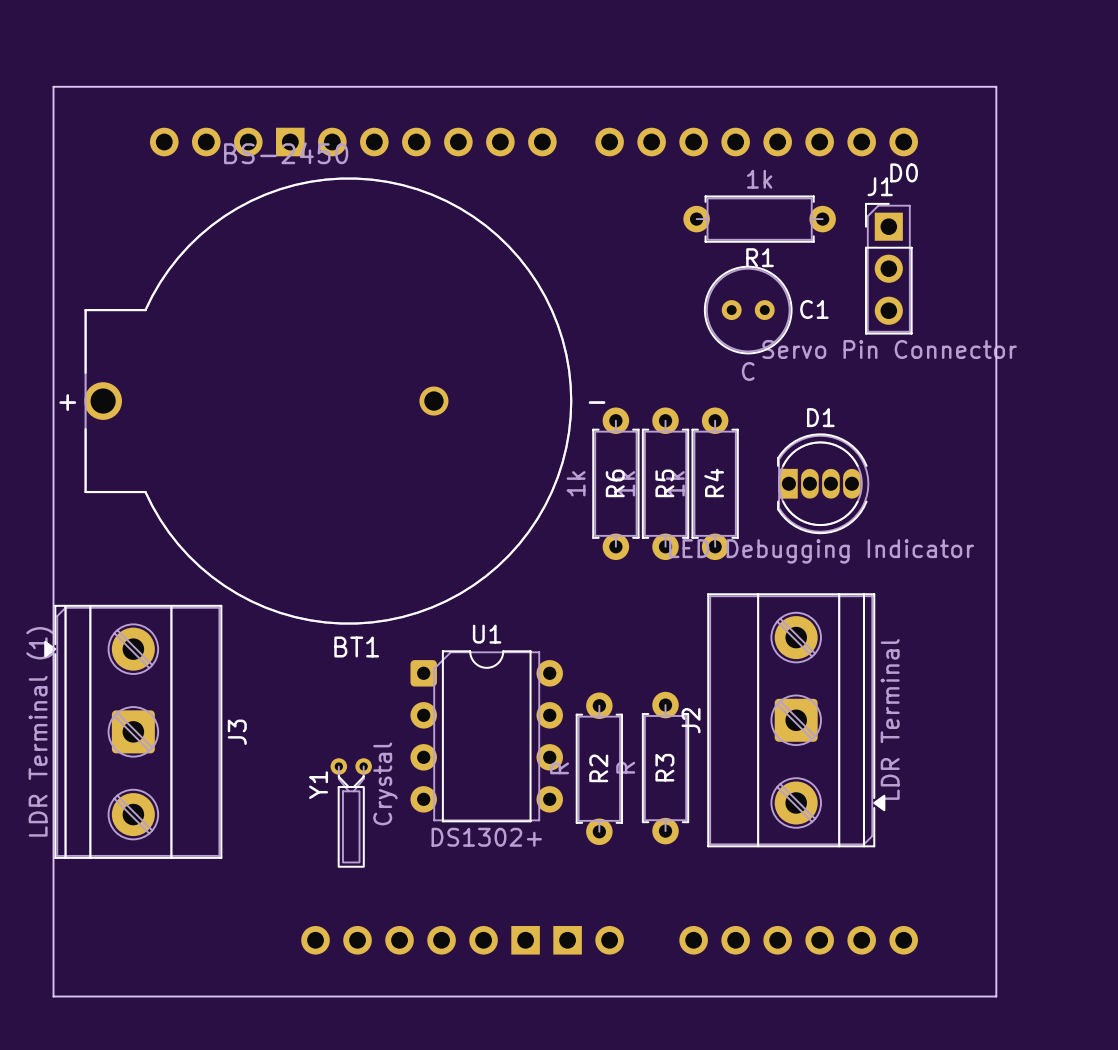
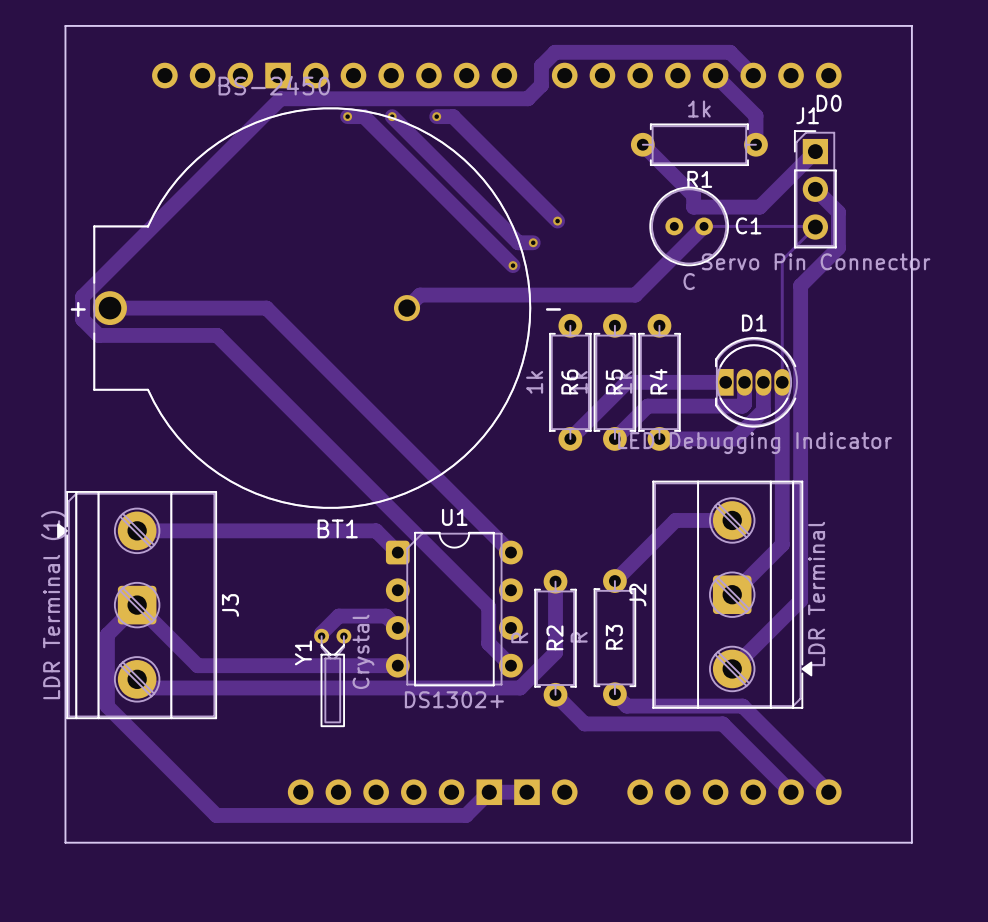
track: none -> (715, 75) (755, 115) (755, 144)
track: none -> (753, 75) (730, 52) (555, 52) (541, 65) (541, 85) (527, 98) (280, 98) (82, 296) (82, 319) (98, 335) (217, 335) (488, 606) (488, 643) (510, 665)
track: none -> (347, 116) (364, 116) (513, 265)
via: none -> (347, 116)
track: none -> (392, 116) (518, 242) (533, 242)
via: none -> (392, 116)
track: none -> (436, 116) (453, 116) (557, 221)
via: none -> (436, 116)
track: none -> (642, 144) (693, 195) (693, 207) (759, 207) (815, 151)
track: none -> (815, 189) (838, 212) (838, 247) (800, 285) (800, 600) (732, 668)
via: none -> (557, 221)
via: none -> (533, 242)
via: none -> (513, 265)
track: none -> (110, 308) (266, 308) (510, 552)
track: none -> (407, 308) (420, 295) (635, 295) (704, 226) (814, 226) (782, 260) (782, 544) (732, 594)
track: none -> (725, 382) (626, 382) (570, 438)
track: none -> (744, 382) (744, 404) (742, 406) (647, 406) (614, 438)
track: none -> (763, 382) (763, 410) (735, 438) (659, 438)
track: none -> (732, 520) (675, 520) (614, 581)
track: none -> (137, 530) (376, 530) (397, 552)
track: none -> (555, 581) (555, 652) (520, 687) (145, 687) (137, 679)
track: none -> (397, 627) (385, 616) (338, 616) (321, 633) (321, 636)
track: none -> (397, 665) (197, 665) (137, 605) (107, 634) (107, 706) (216, 815) (466, 815) (489, 792) (527, 792)
track: none -> (555, 694) (584, 723) (722, 723) (791, 792)
track: none -> (614, 694) (626, 706) (742, 706) (828, 792)

